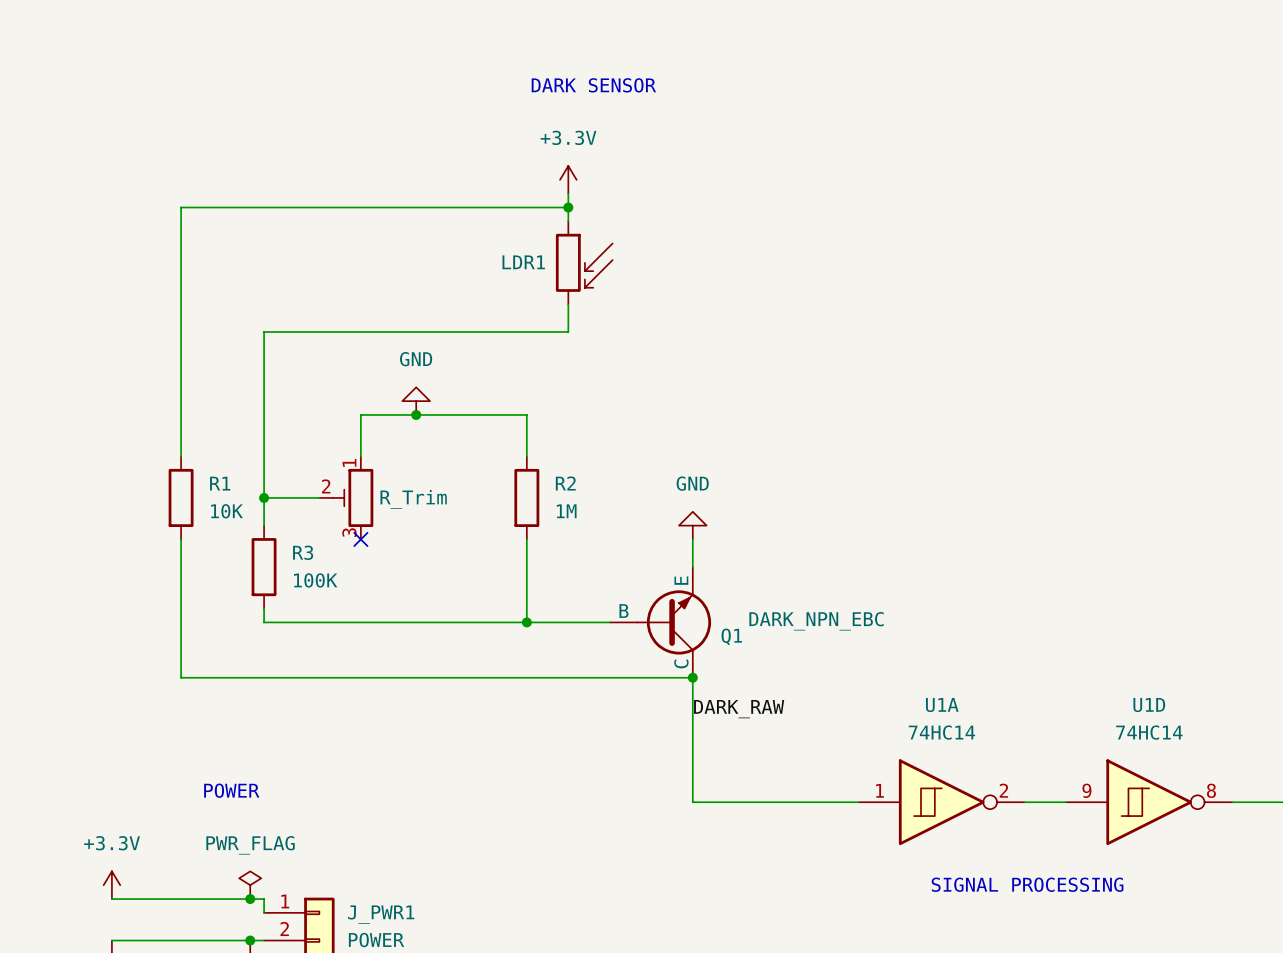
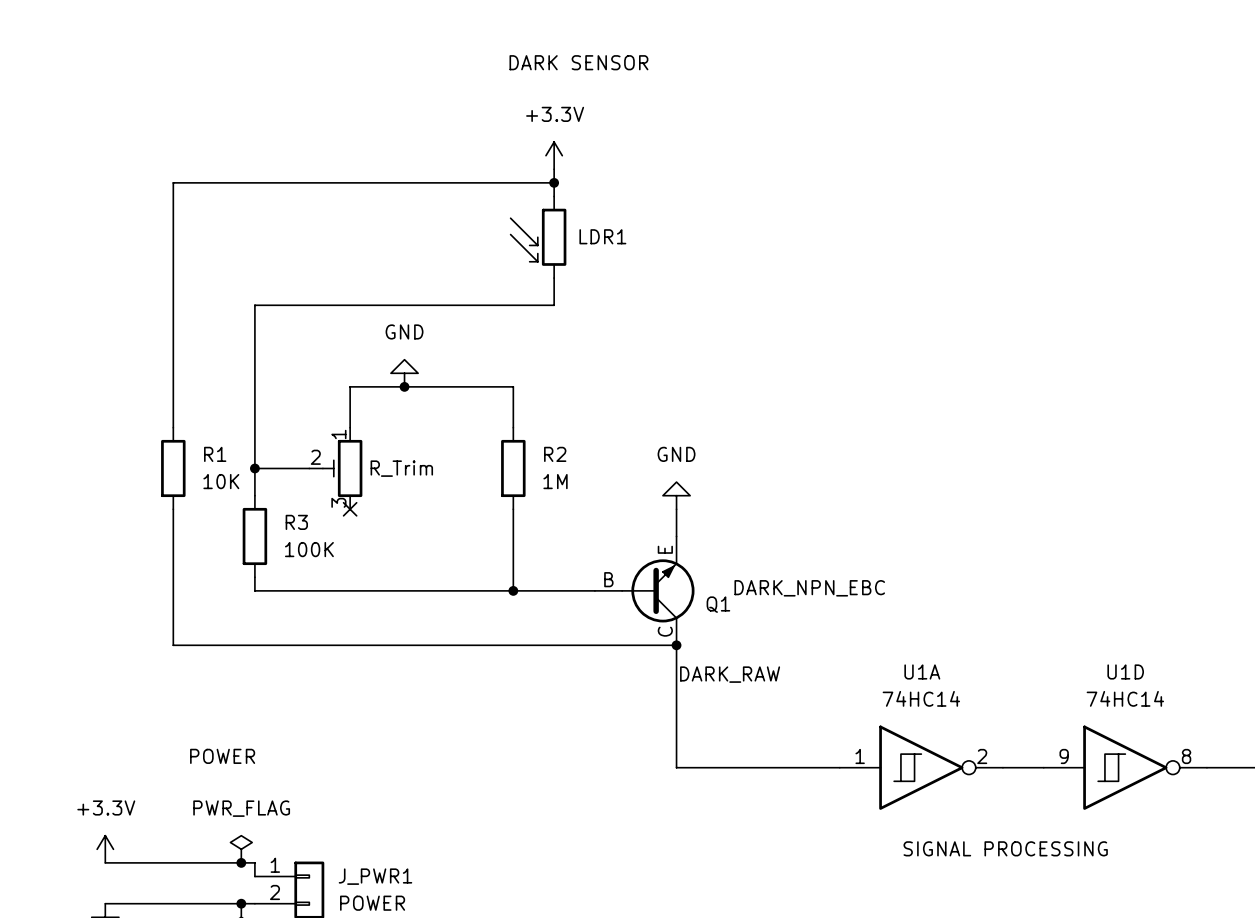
LDR1 flip: as is (584, 262) -> left-right (538, 237)

